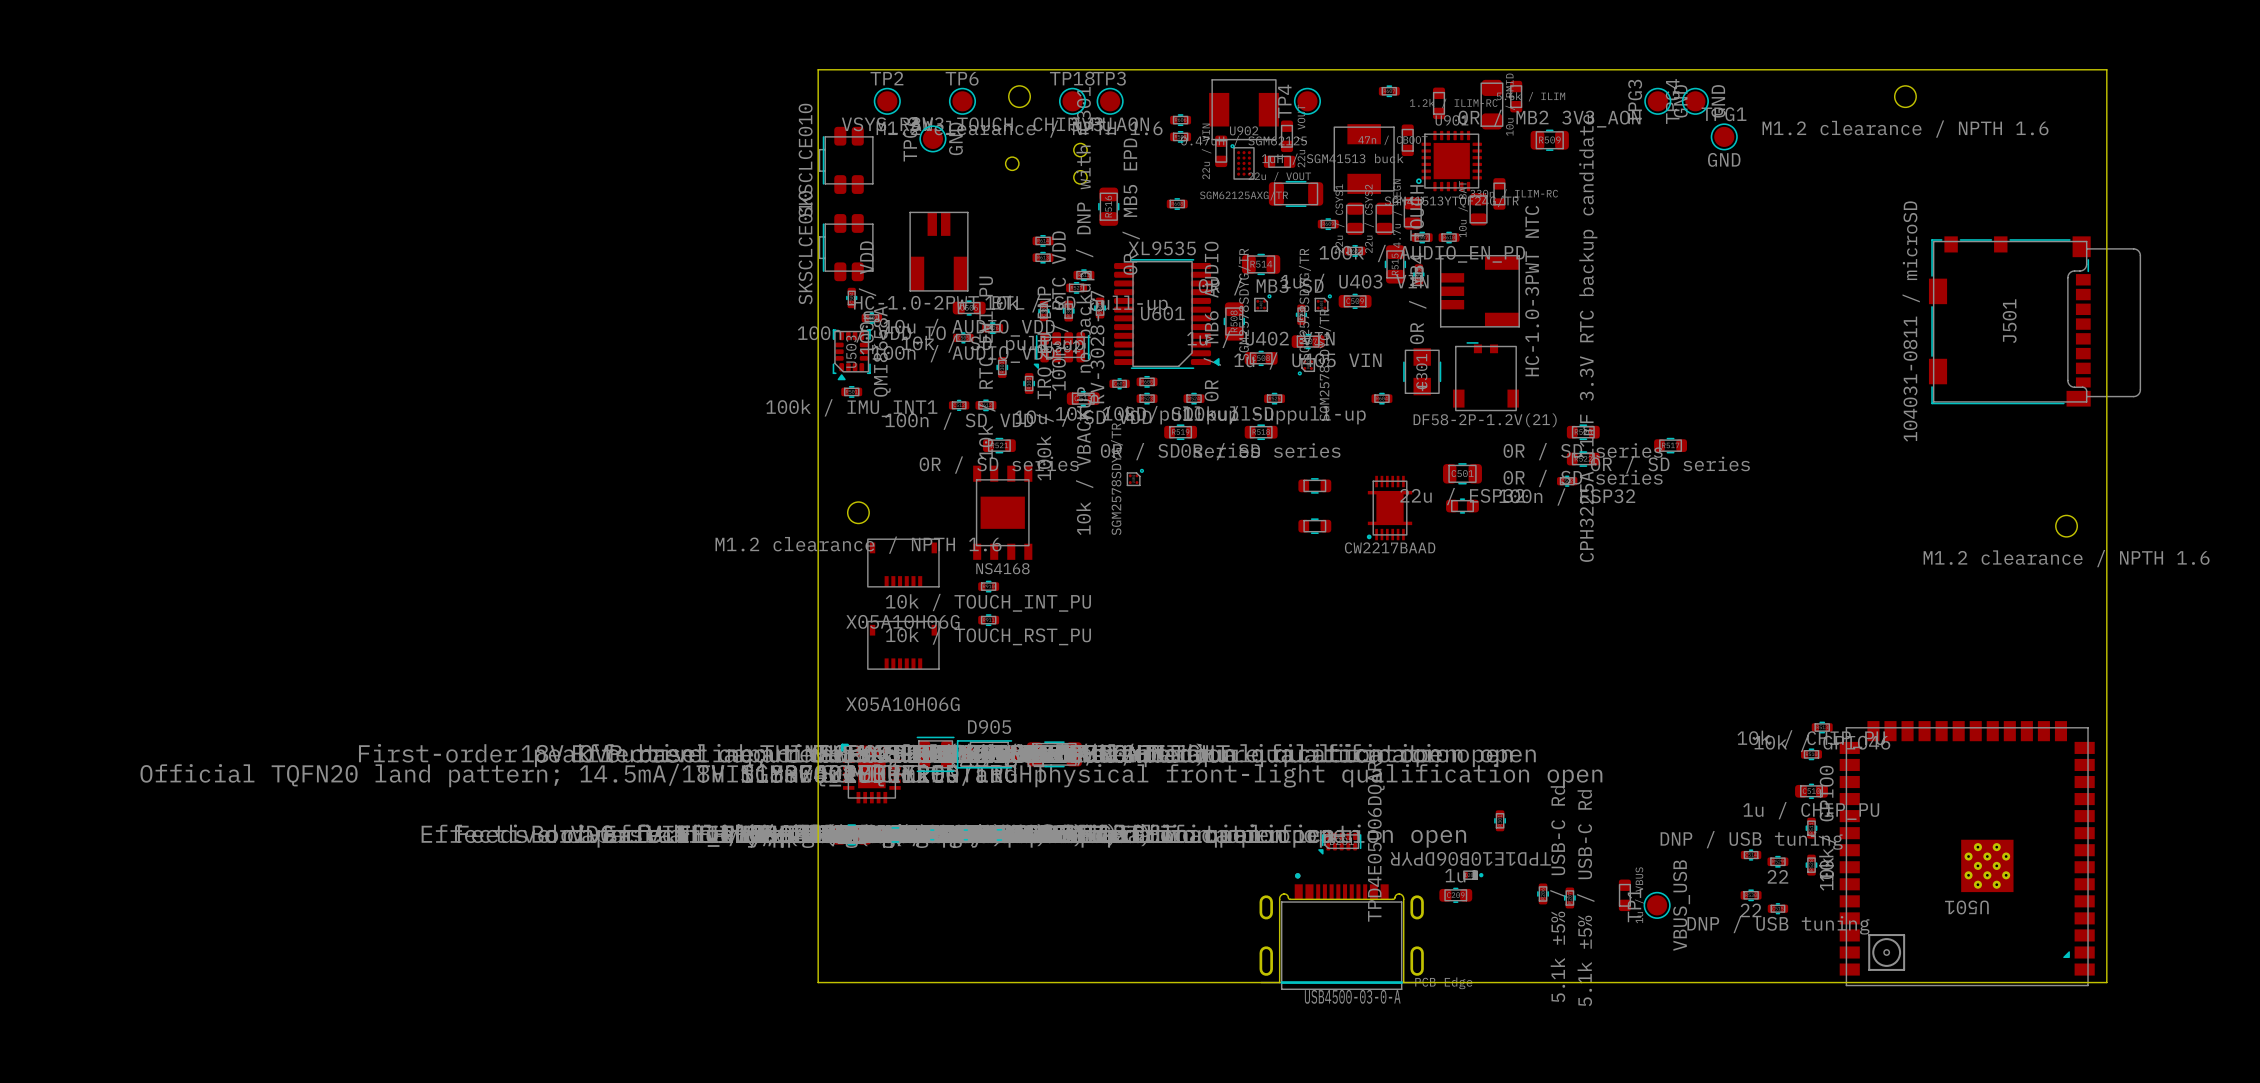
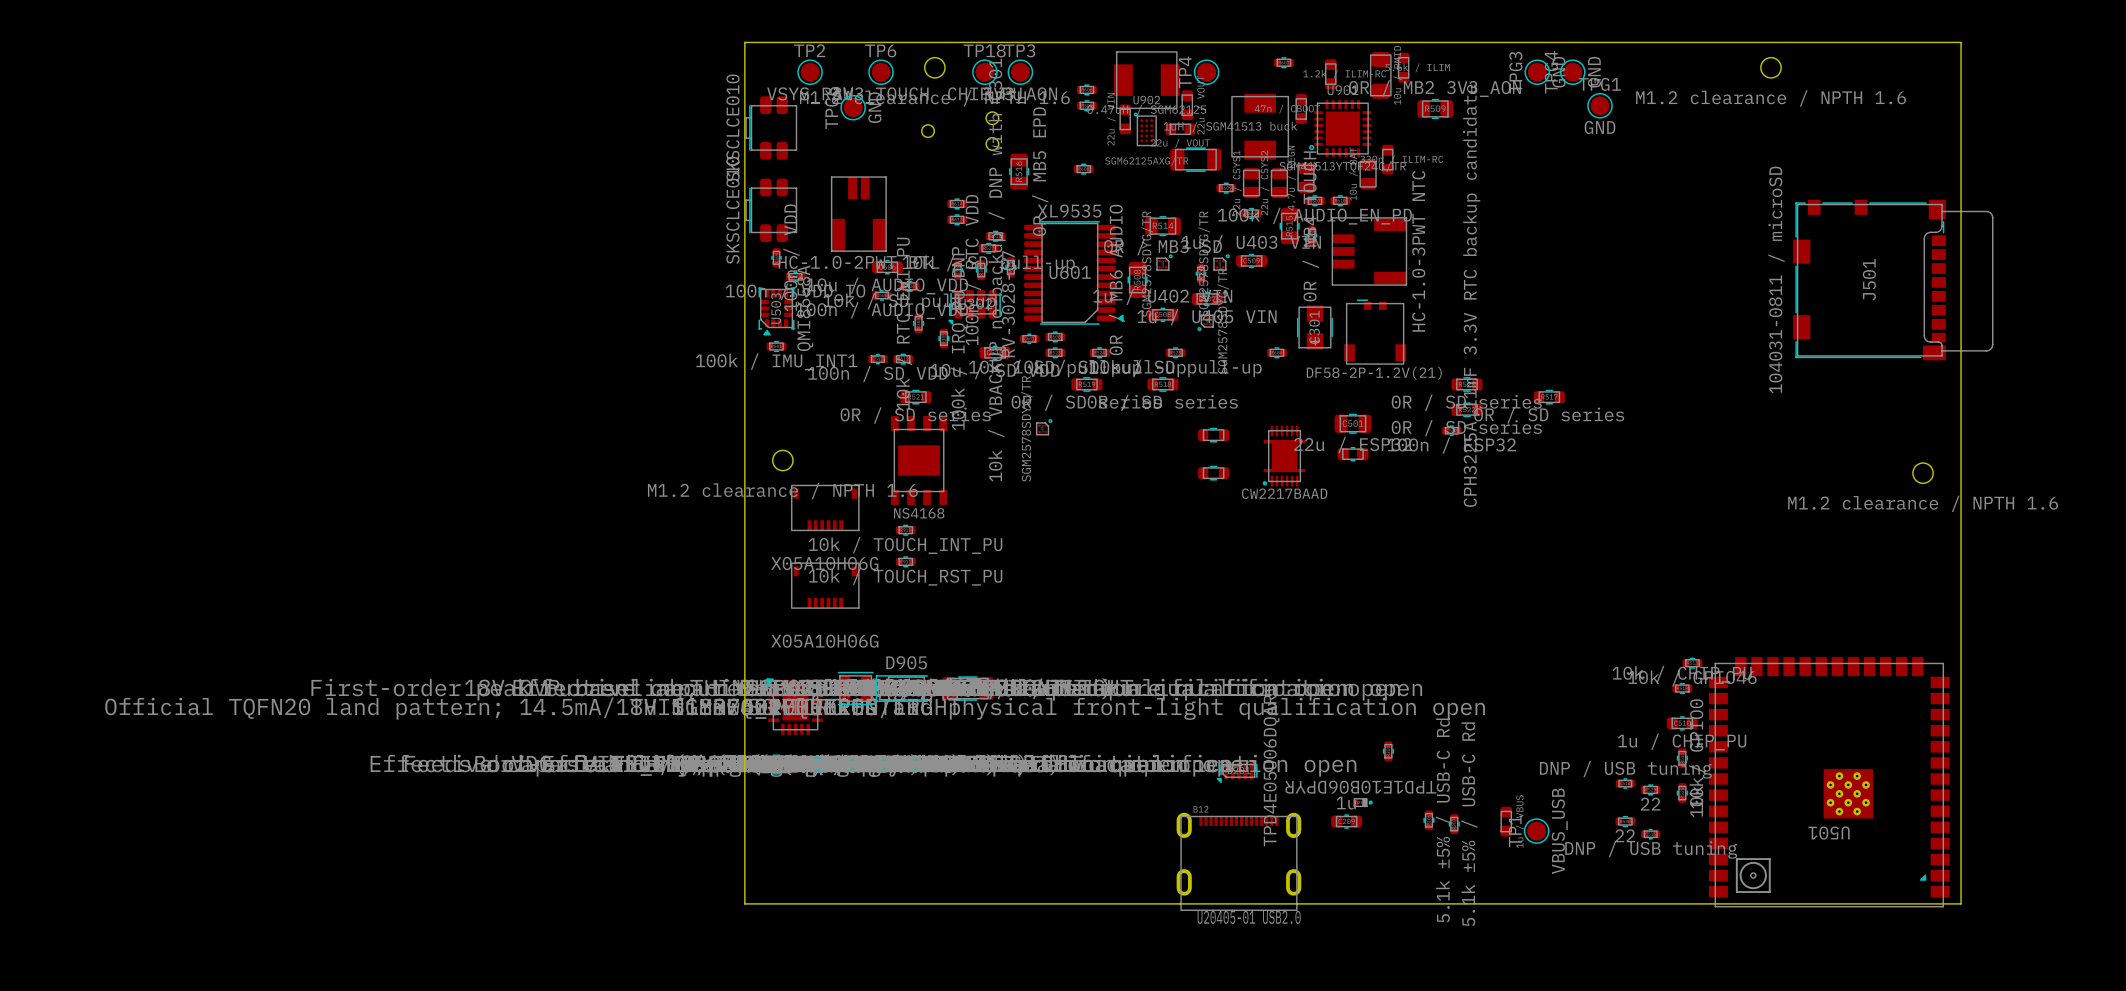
part footprint: [1259, 873, 1424, 990] -> [1176, 812, 1302, 911]
board edge: none -> (1180, 903) (1297, 903)
part value: USB4500-03-0-A (1352, 996) -> U20405-01 USB2.0 (1249, 917)

